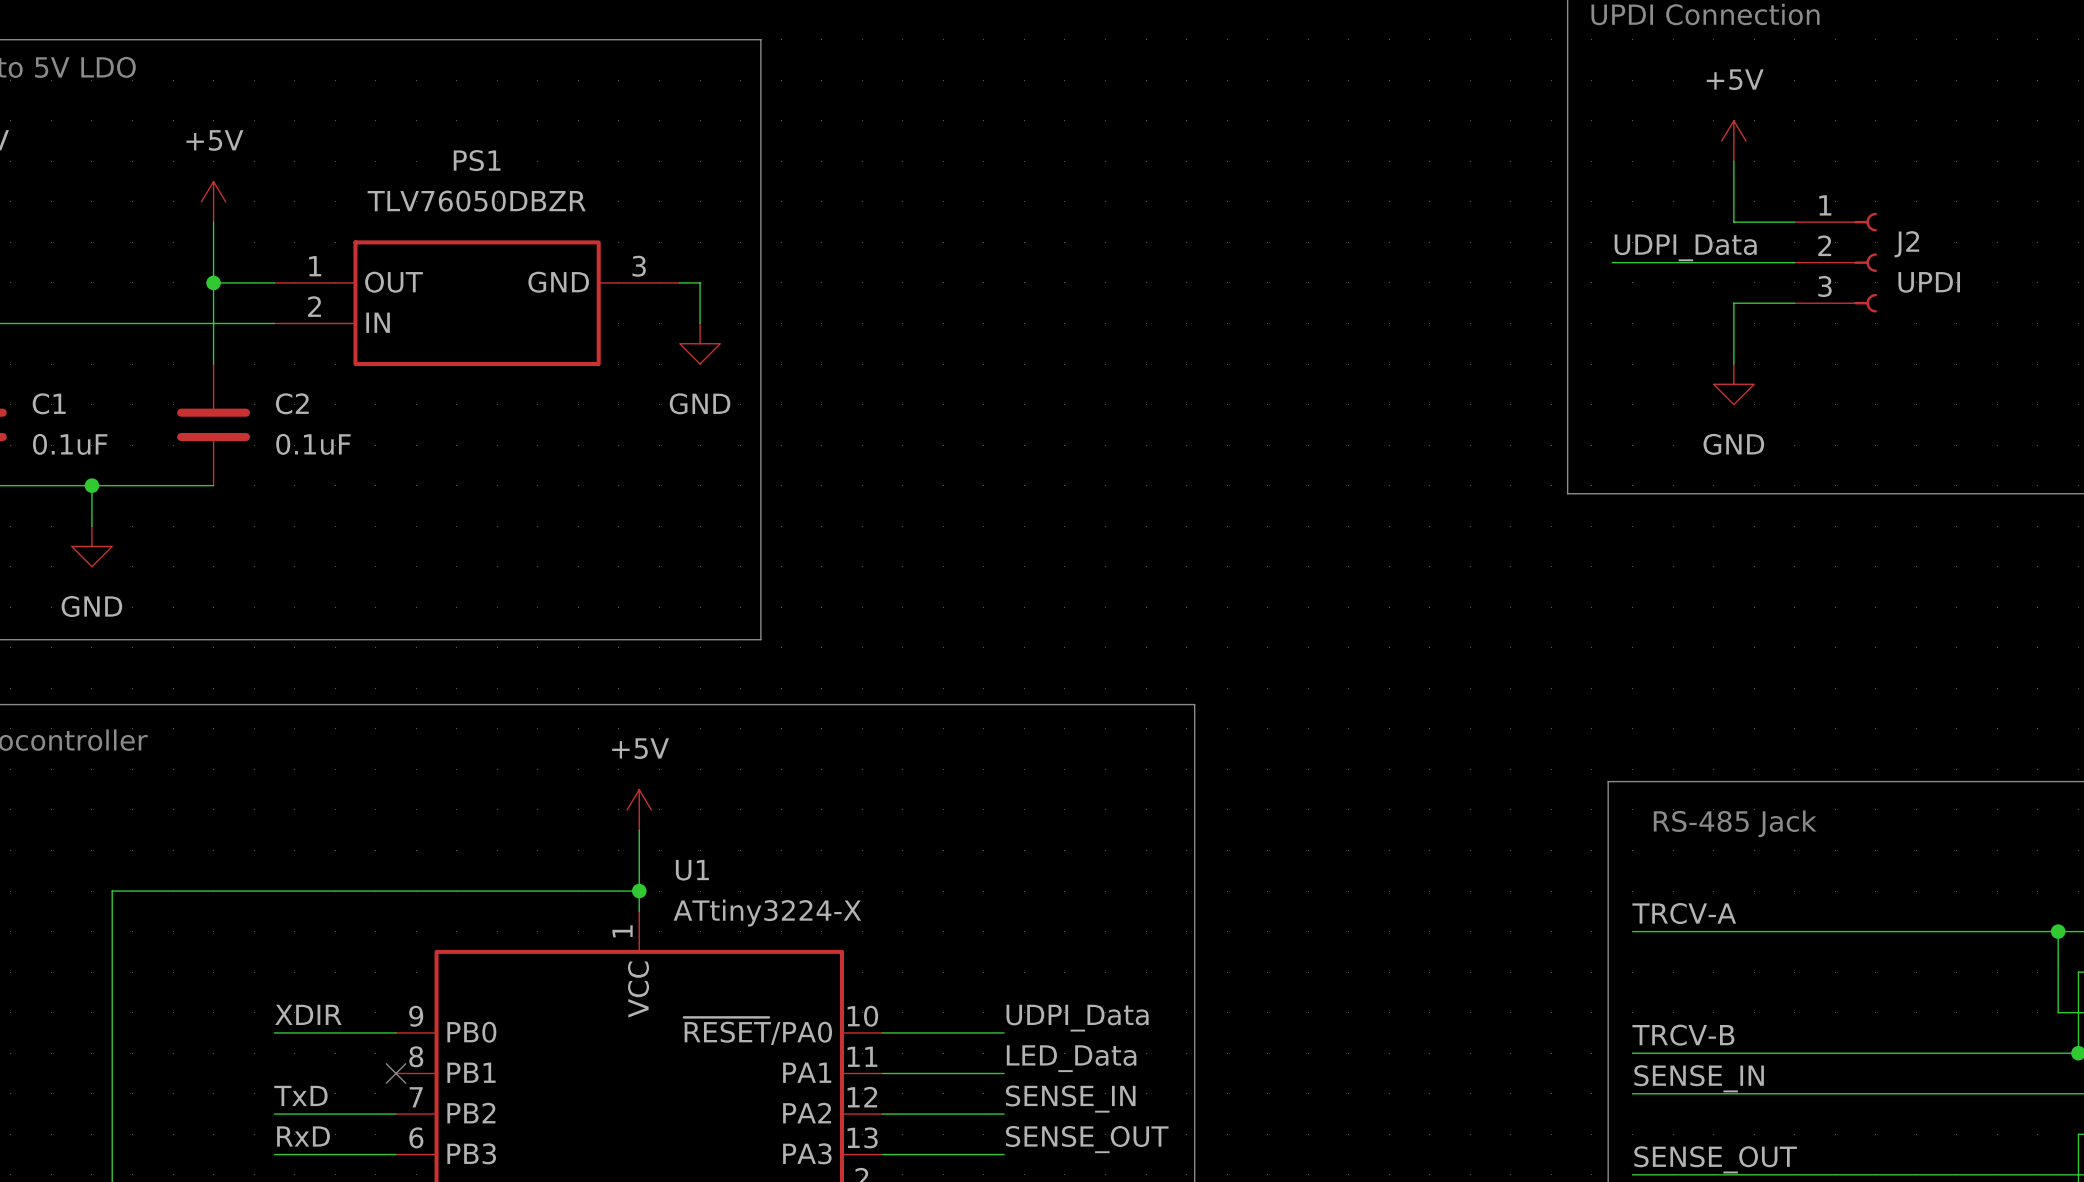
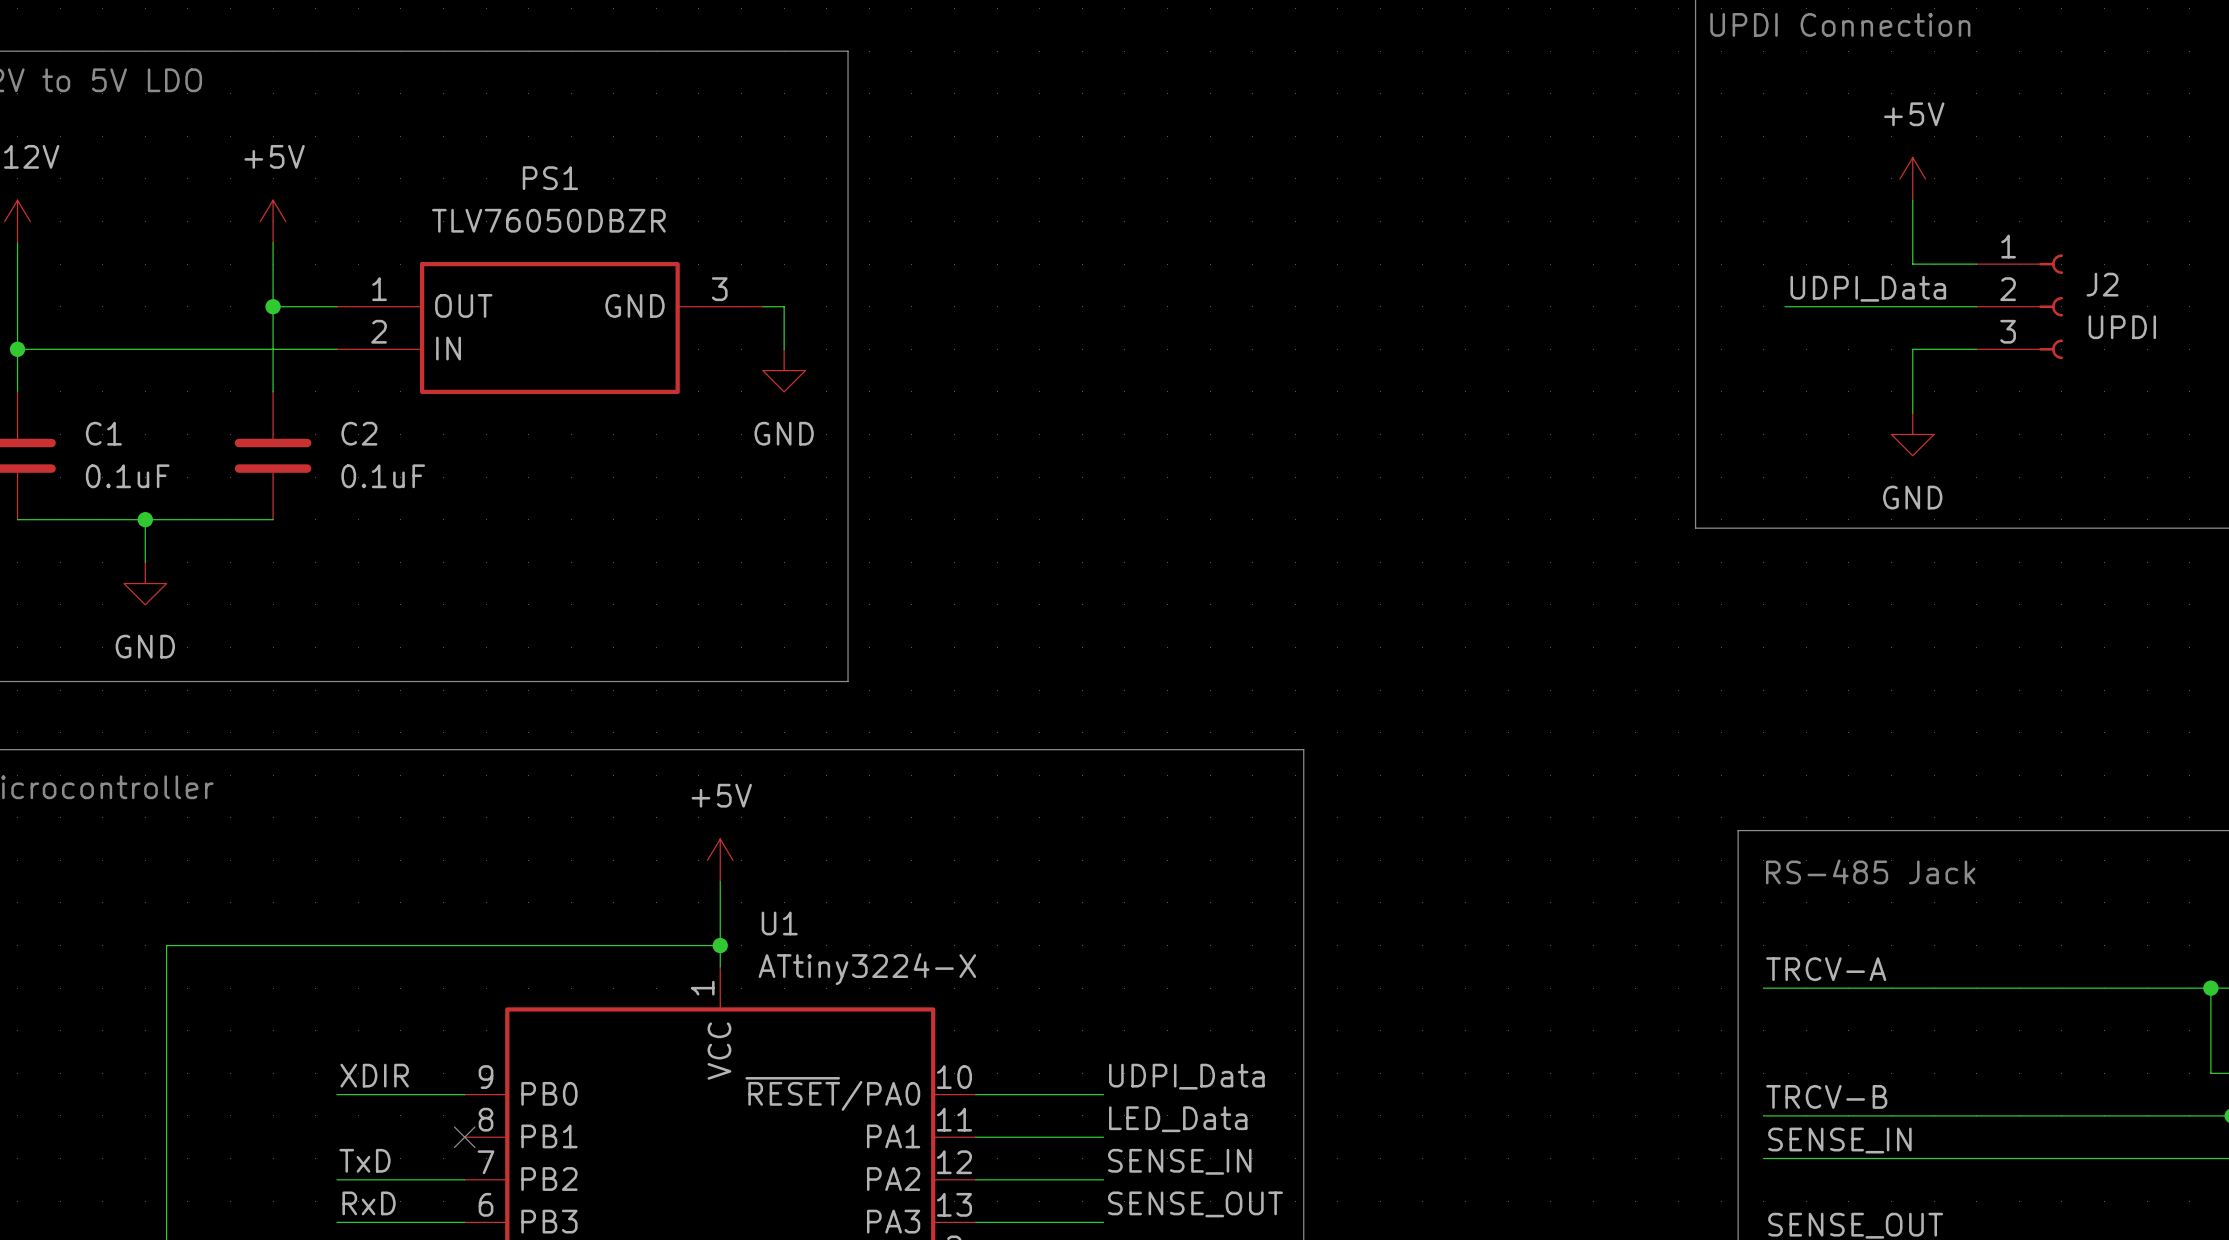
power symbol position: +5V (1733, 141) -> +5V (1912, 178)
wire: (1733, 161) (1733, 222) (1794, 222) -> (1912, 200) (1912, 264) (1976, 264)
label position: UDPI_Data (1685, 247) -> UDPI_Data (1868, 288)
wire: (1612, 262) (1794, 262) -> (1784, 306) (1976, 306)
J2 position: (1835, 262) -> (2019, 306)
wire: (1794, 303) (1733, 303) (1733, 364) -> (1976, 349) (1912, 349) (1912, 413)
power symbol position: GND (1733, 384) -> GND (1912, 434)

